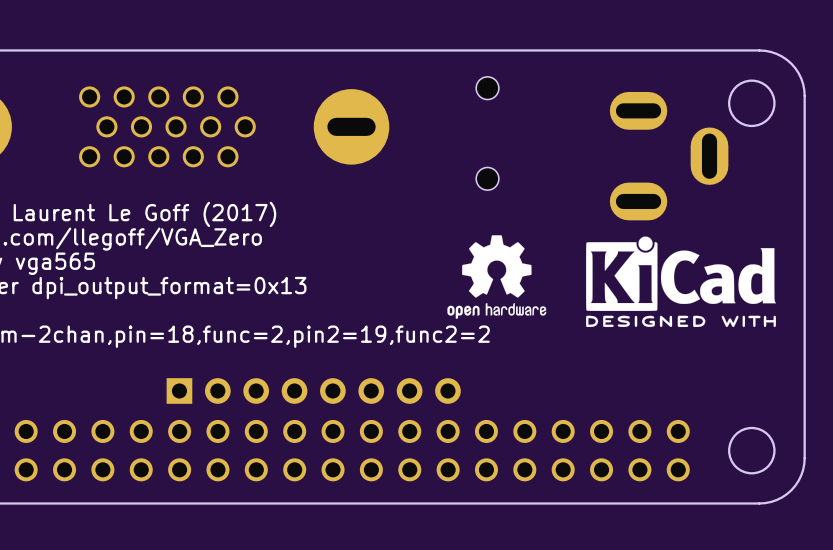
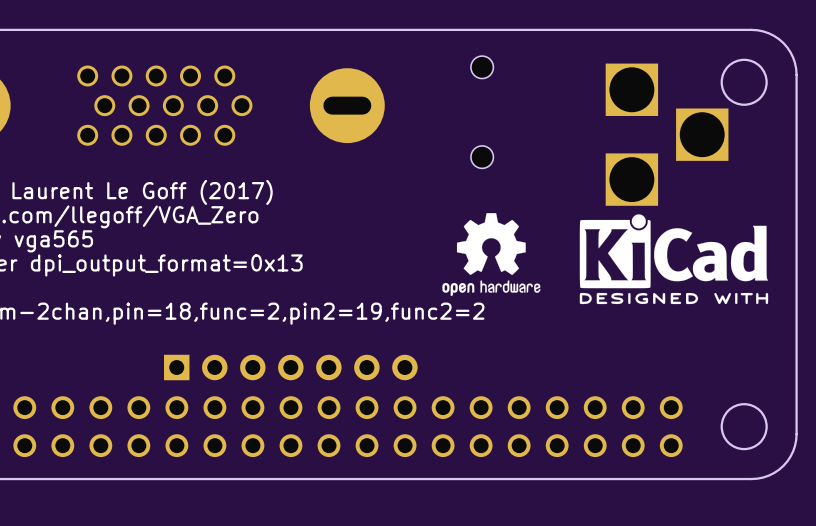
part footprint: [609, 91, 729, 221] -> [605, 63, 729, 206]
part: (313, 390) -> none

